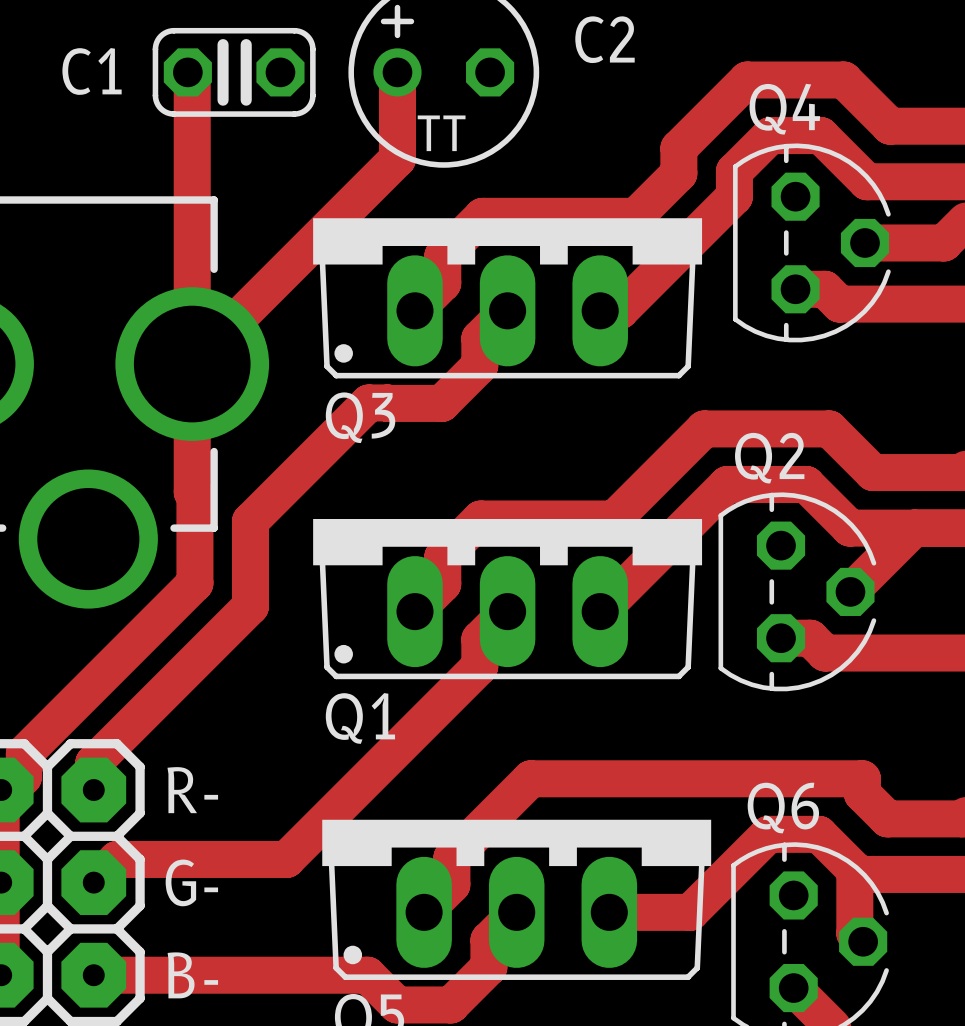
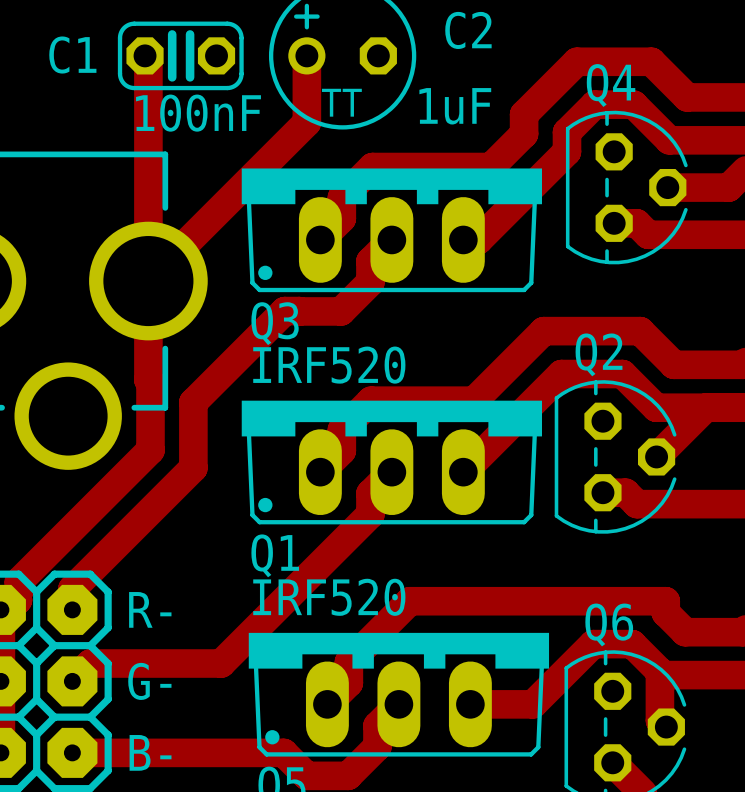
C2 value: none -> 1uF (455, 106)
C1 value: none -> 100nF (198, 113)
Q3 value: none -> IRF520 (329, 365)
Q1 value: none -> IRF520 (329, 597)

